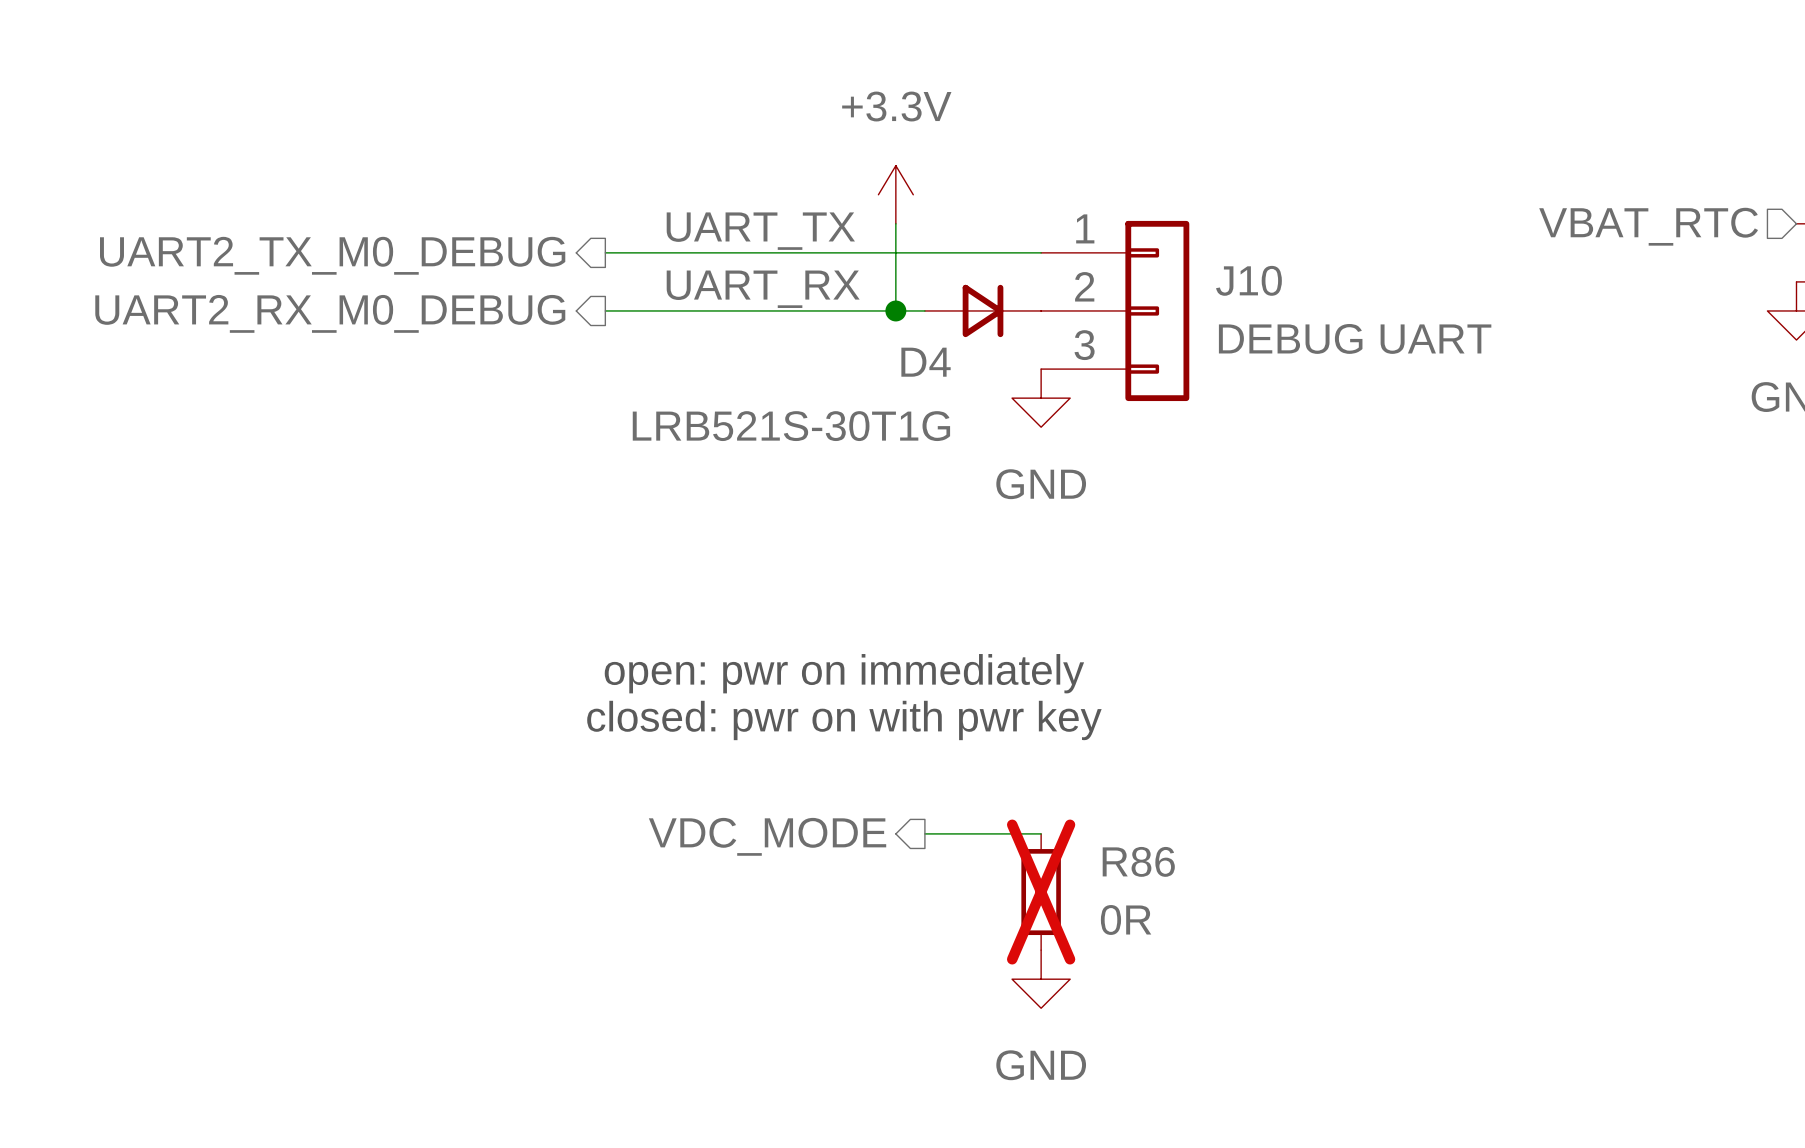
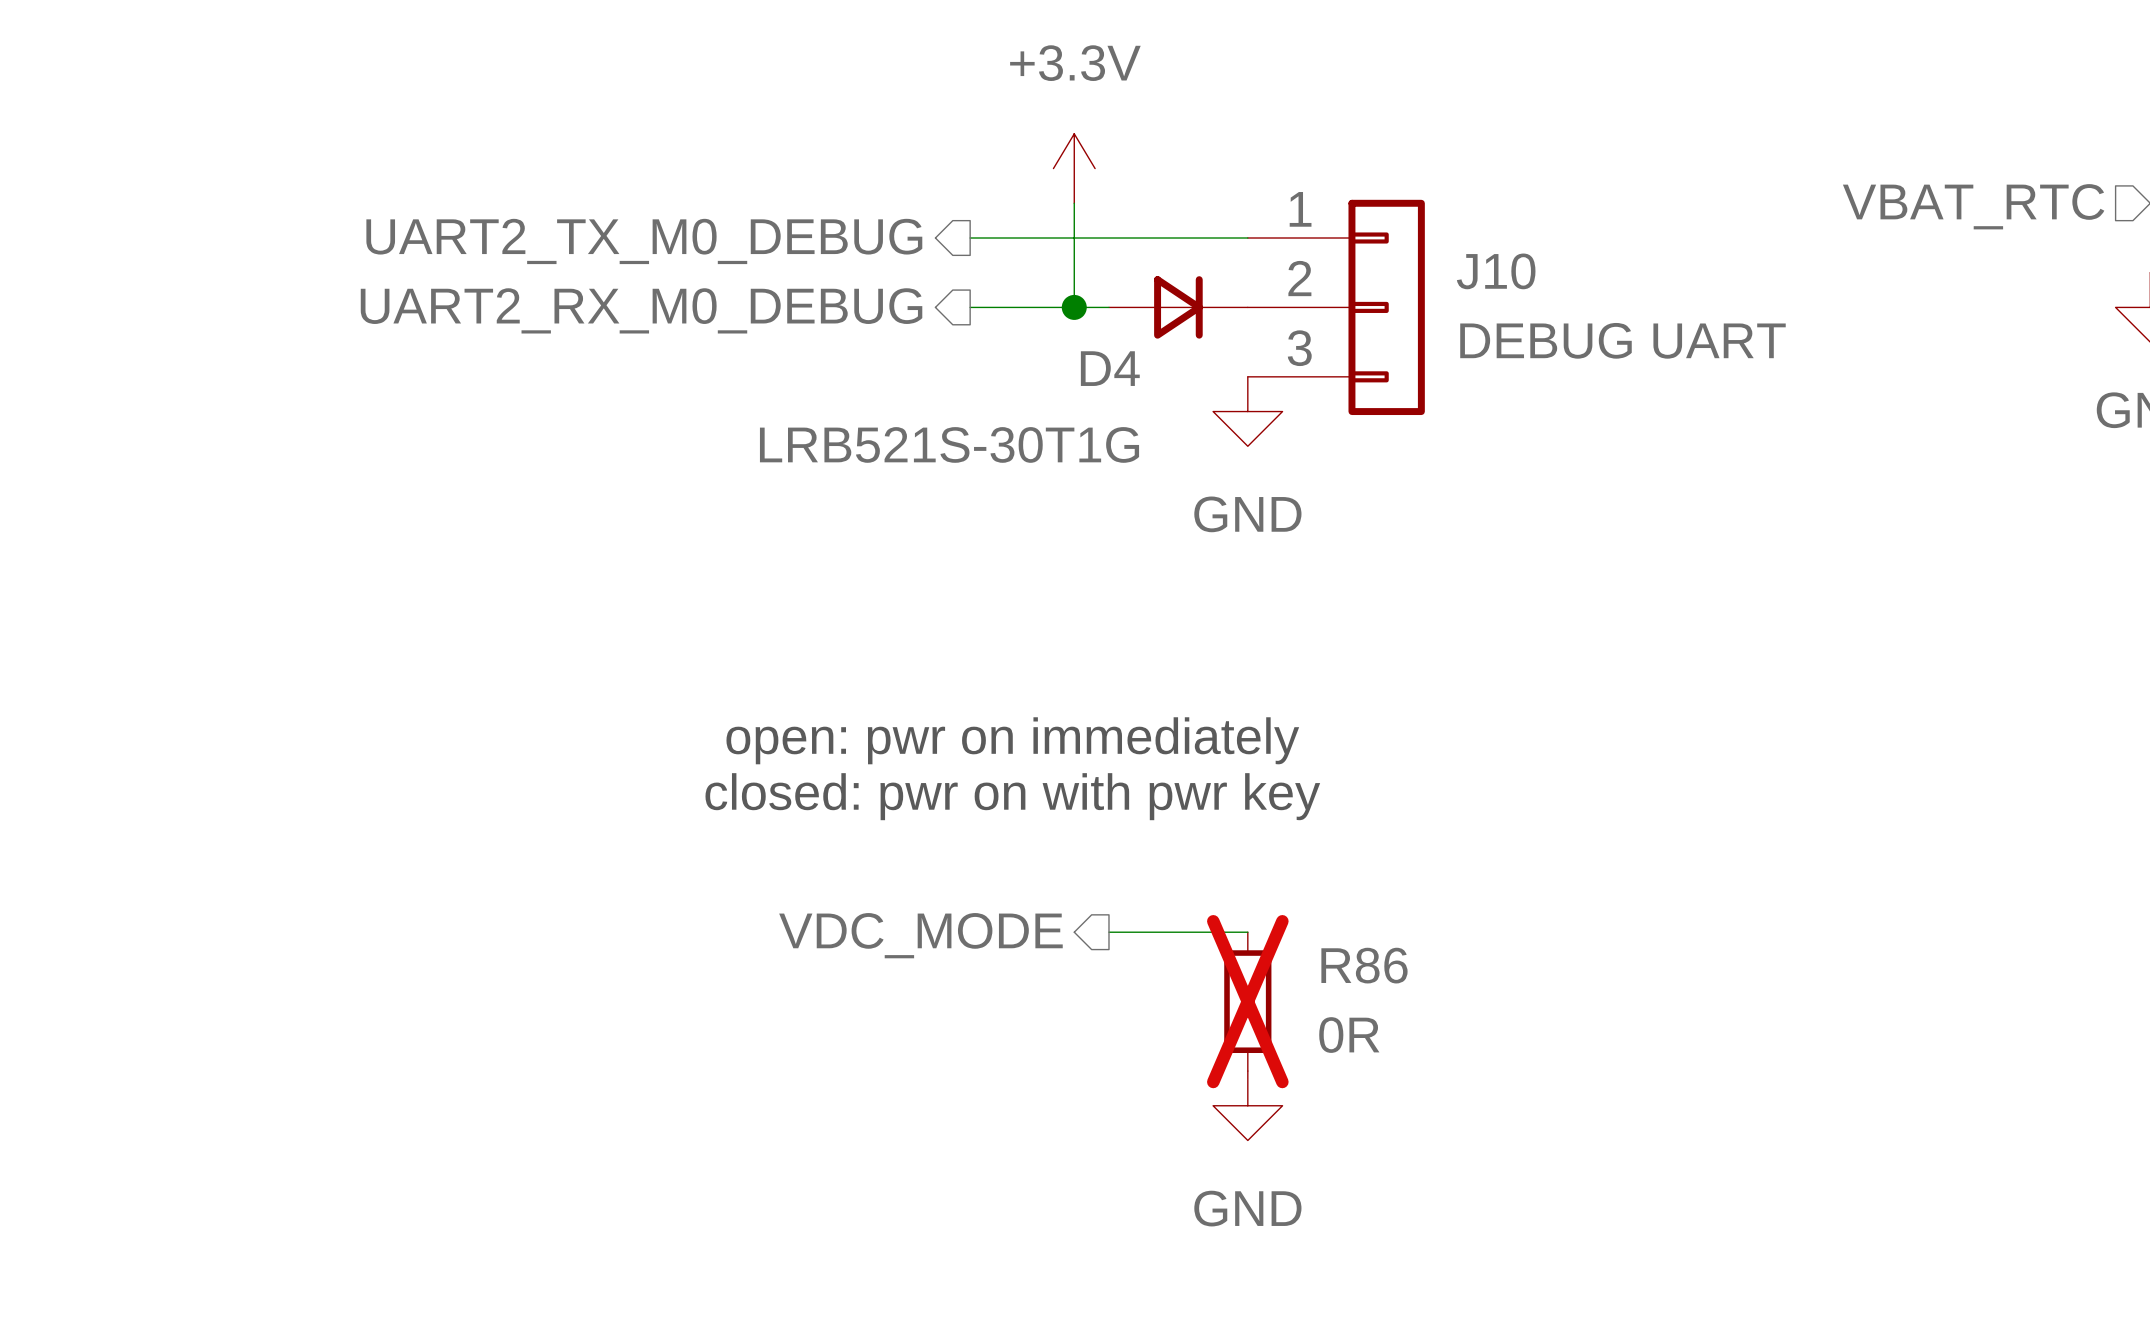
label: UART_TX (760, 231) -> none
wire: (605, 252) (808, 252) -> none
hierarchical label position: UART2_TX_M0_DEBUG (332, 255) -> UART2_TX_M0_DEBUG (644, 241)
label: UART_RX (763, 289) -> none
wire: (605, 310) (808, 310) -> none
hierarchical label position: UART2_RX_M0_DEBUG (330, 313) -> UART2_RX_M0_DEBUG (641, 310)

